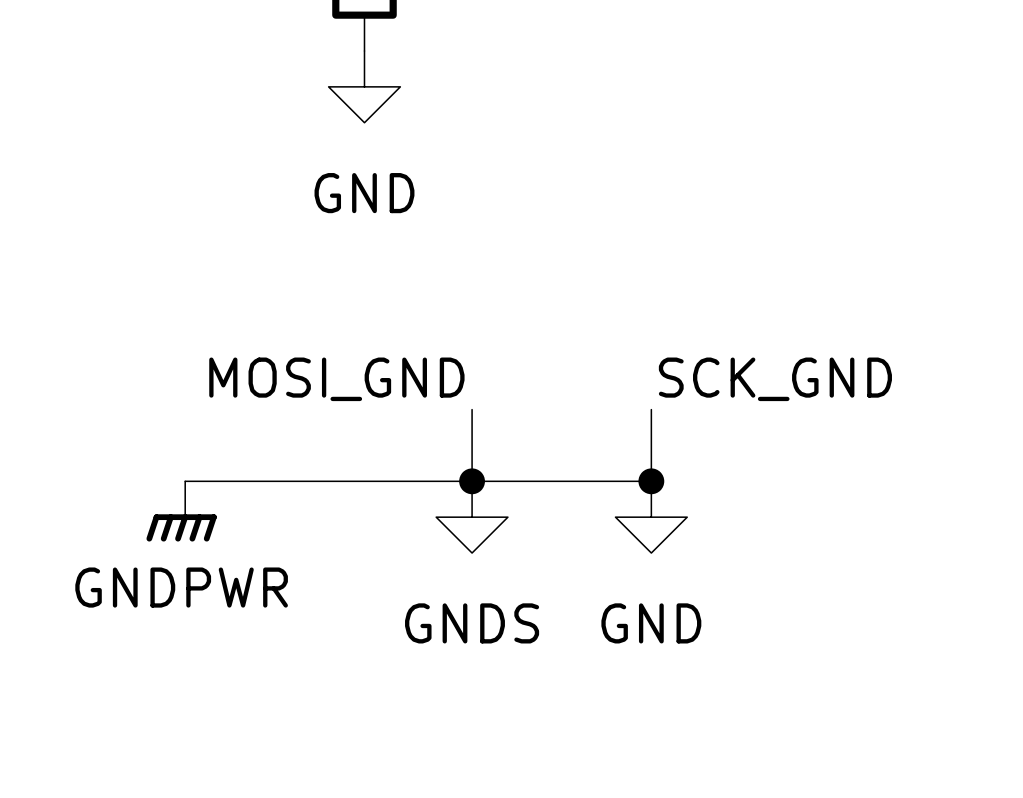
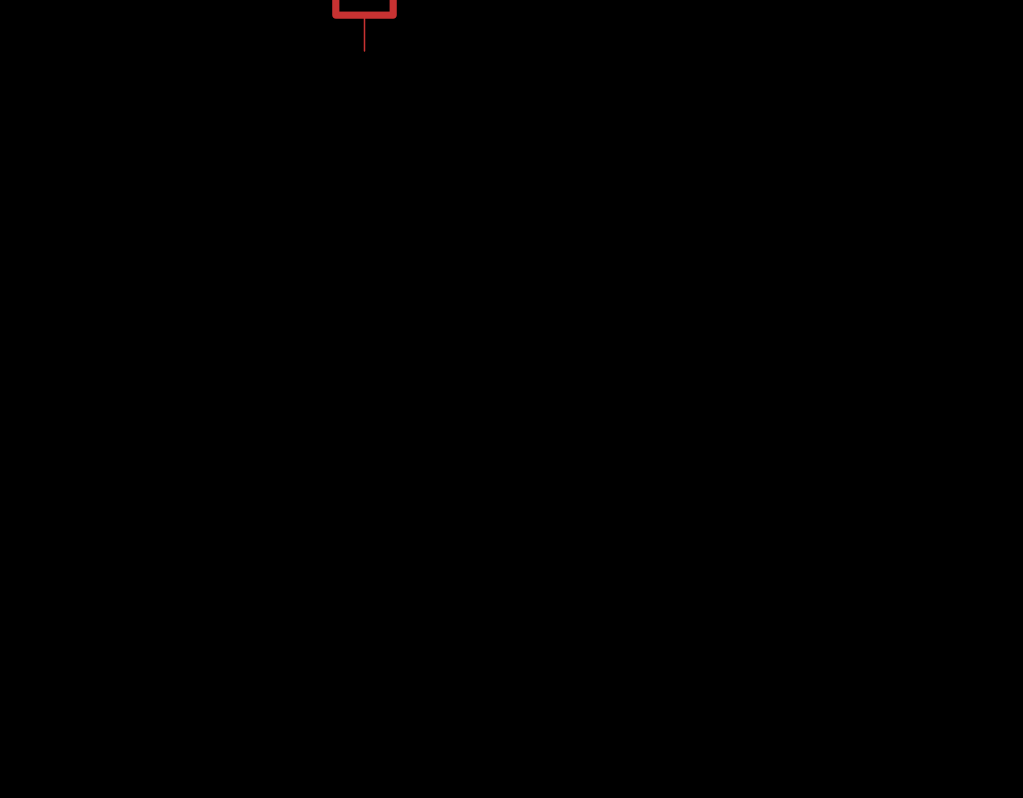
power symbol: GND (364, 86) -> none
label: MOSI_GND (336, 379) -> none
label: SCK_GND (775, 379) -> none
wire: (472, 409) (472, 481) -> none
wire: (651, 409) (651, 481) (185, 481) -> none
junction: (472, 481) -> none
junction: (651, 481) -> none
power symbol: GNDPWR (181, 511) -> none
power symbol: GNDS (472, 517) -> none
power symbol: GND (651, 517) -> none

